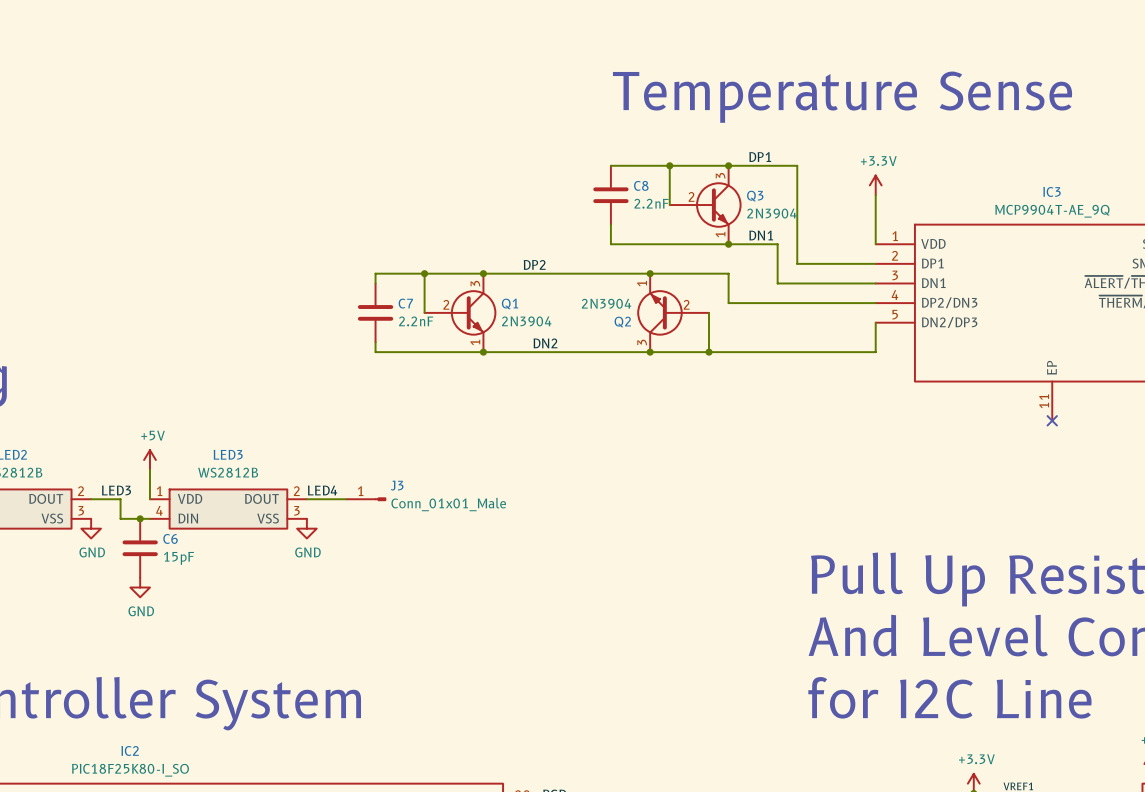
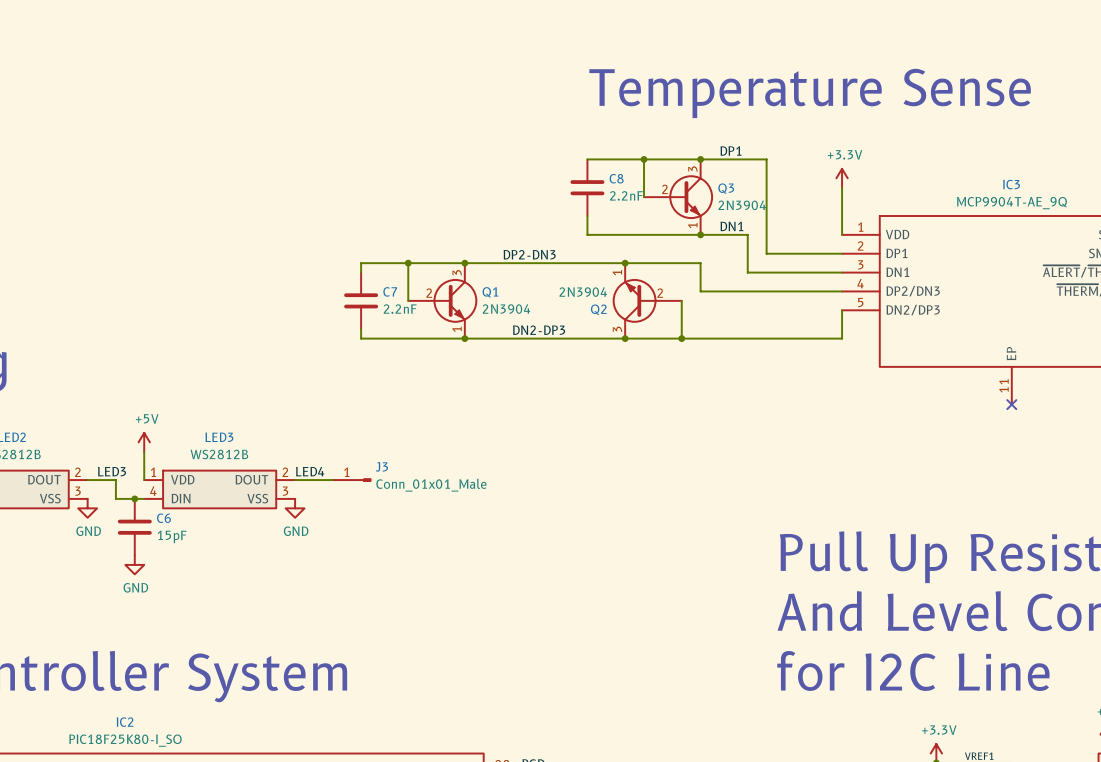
label: DP2 (534, 264) -> DP2-DN3 (529, 254)
label: DN2 (545, 343) -> DN2-DP3 (539, 330)

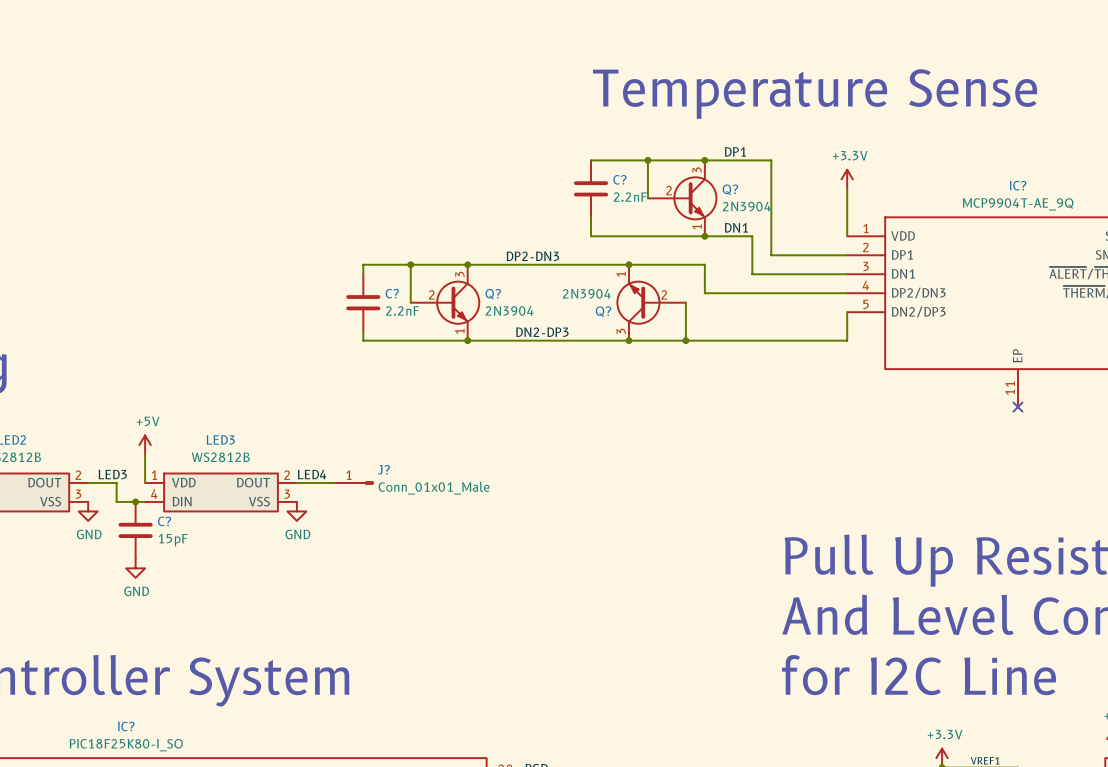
C8 name: C8 (616, 178) -> C? (619, 179)
IC3 name: IC3 (1011, 184) -> IC? (1018, 185)
Q3 name: Q3 (726, 188) -> Q? (730, 189)
C7 name: C7 (390, 291) -> C? (392, 293)
Q1 name: Q1 (490, 292) -> Q? (493, 294)
Q2 name: Q2 (598, 309) -> Q? (603, 311)
J3 name: J3 (381, 466) -> J? (384, 469)
C6 name: C6 (163, 518) -> C? (164, 521)
IC2 name: IC2 (125, 722) -> IC? (126, 726)

